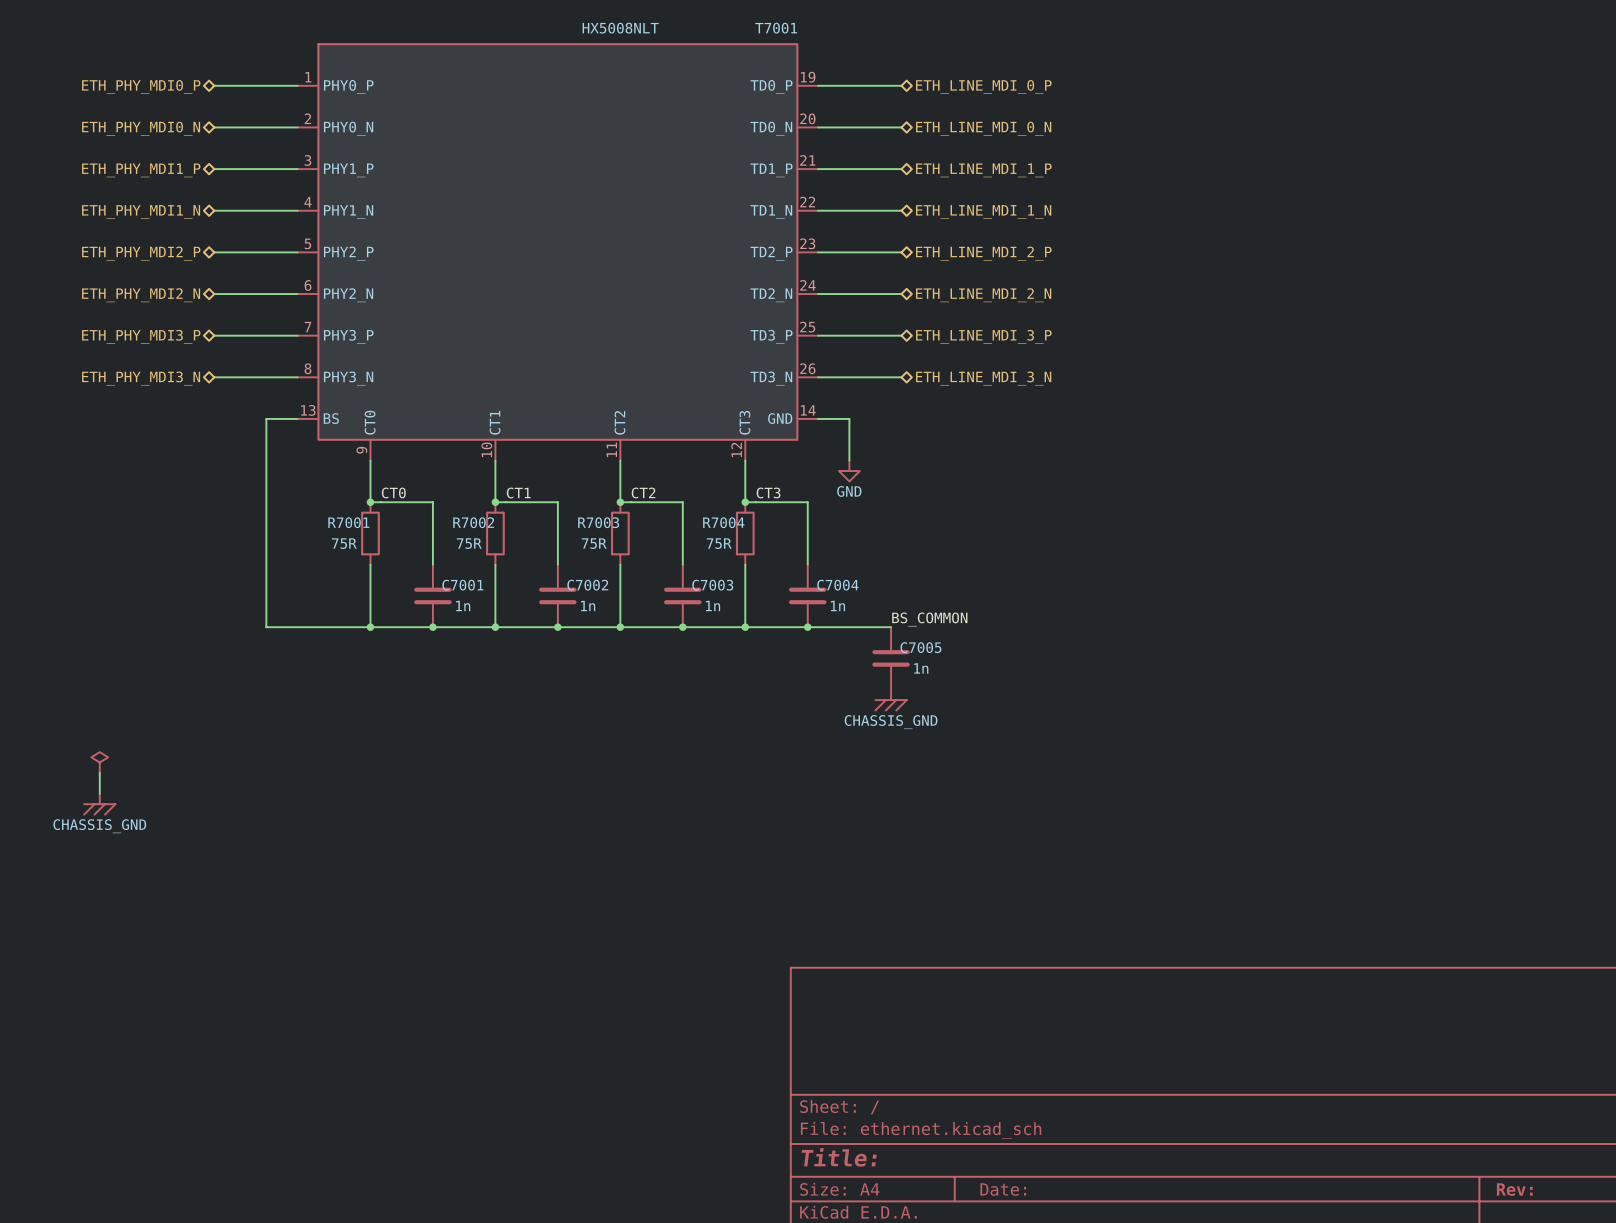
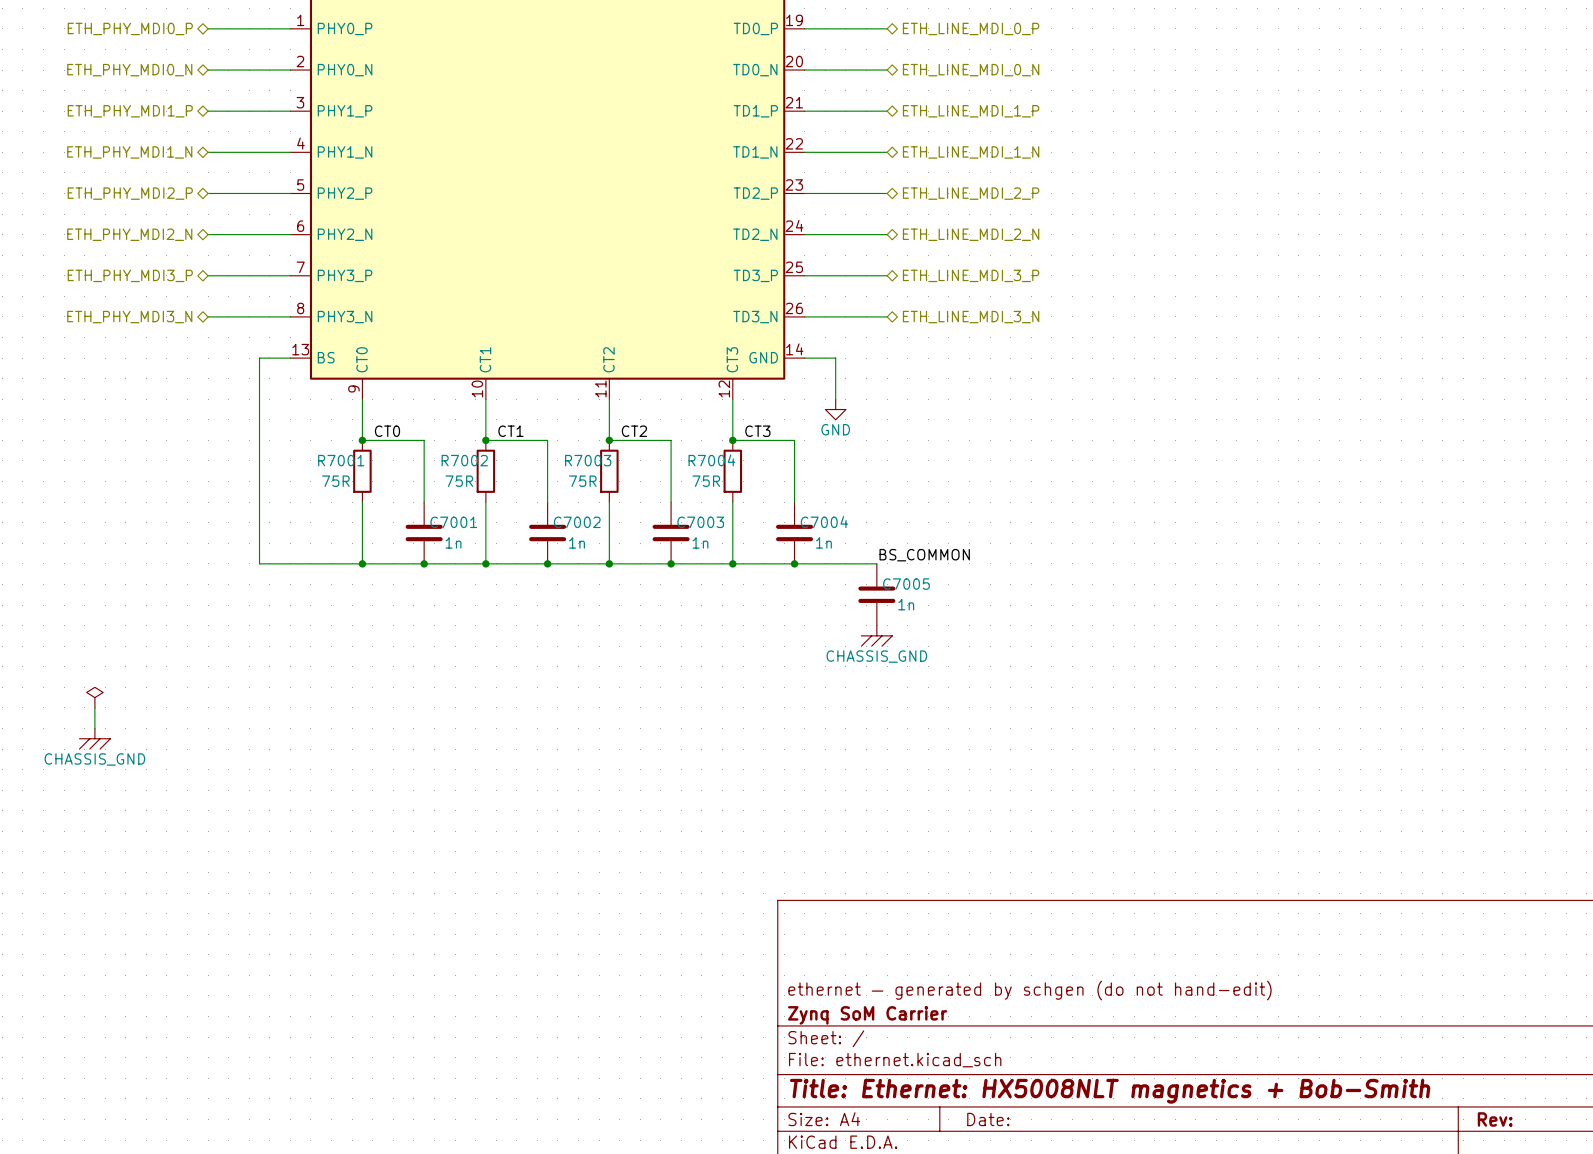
title block: none -> ethernet — generated by schgen (do not hand-edit) (1030, 990)
title block: none -> Zynq SoM Carrier (867, 1015)
title block: Title: (839, 1157) -> Title: Ethernet: HX5008NLT magnetics + Bob-Smith (1110, 1091)

